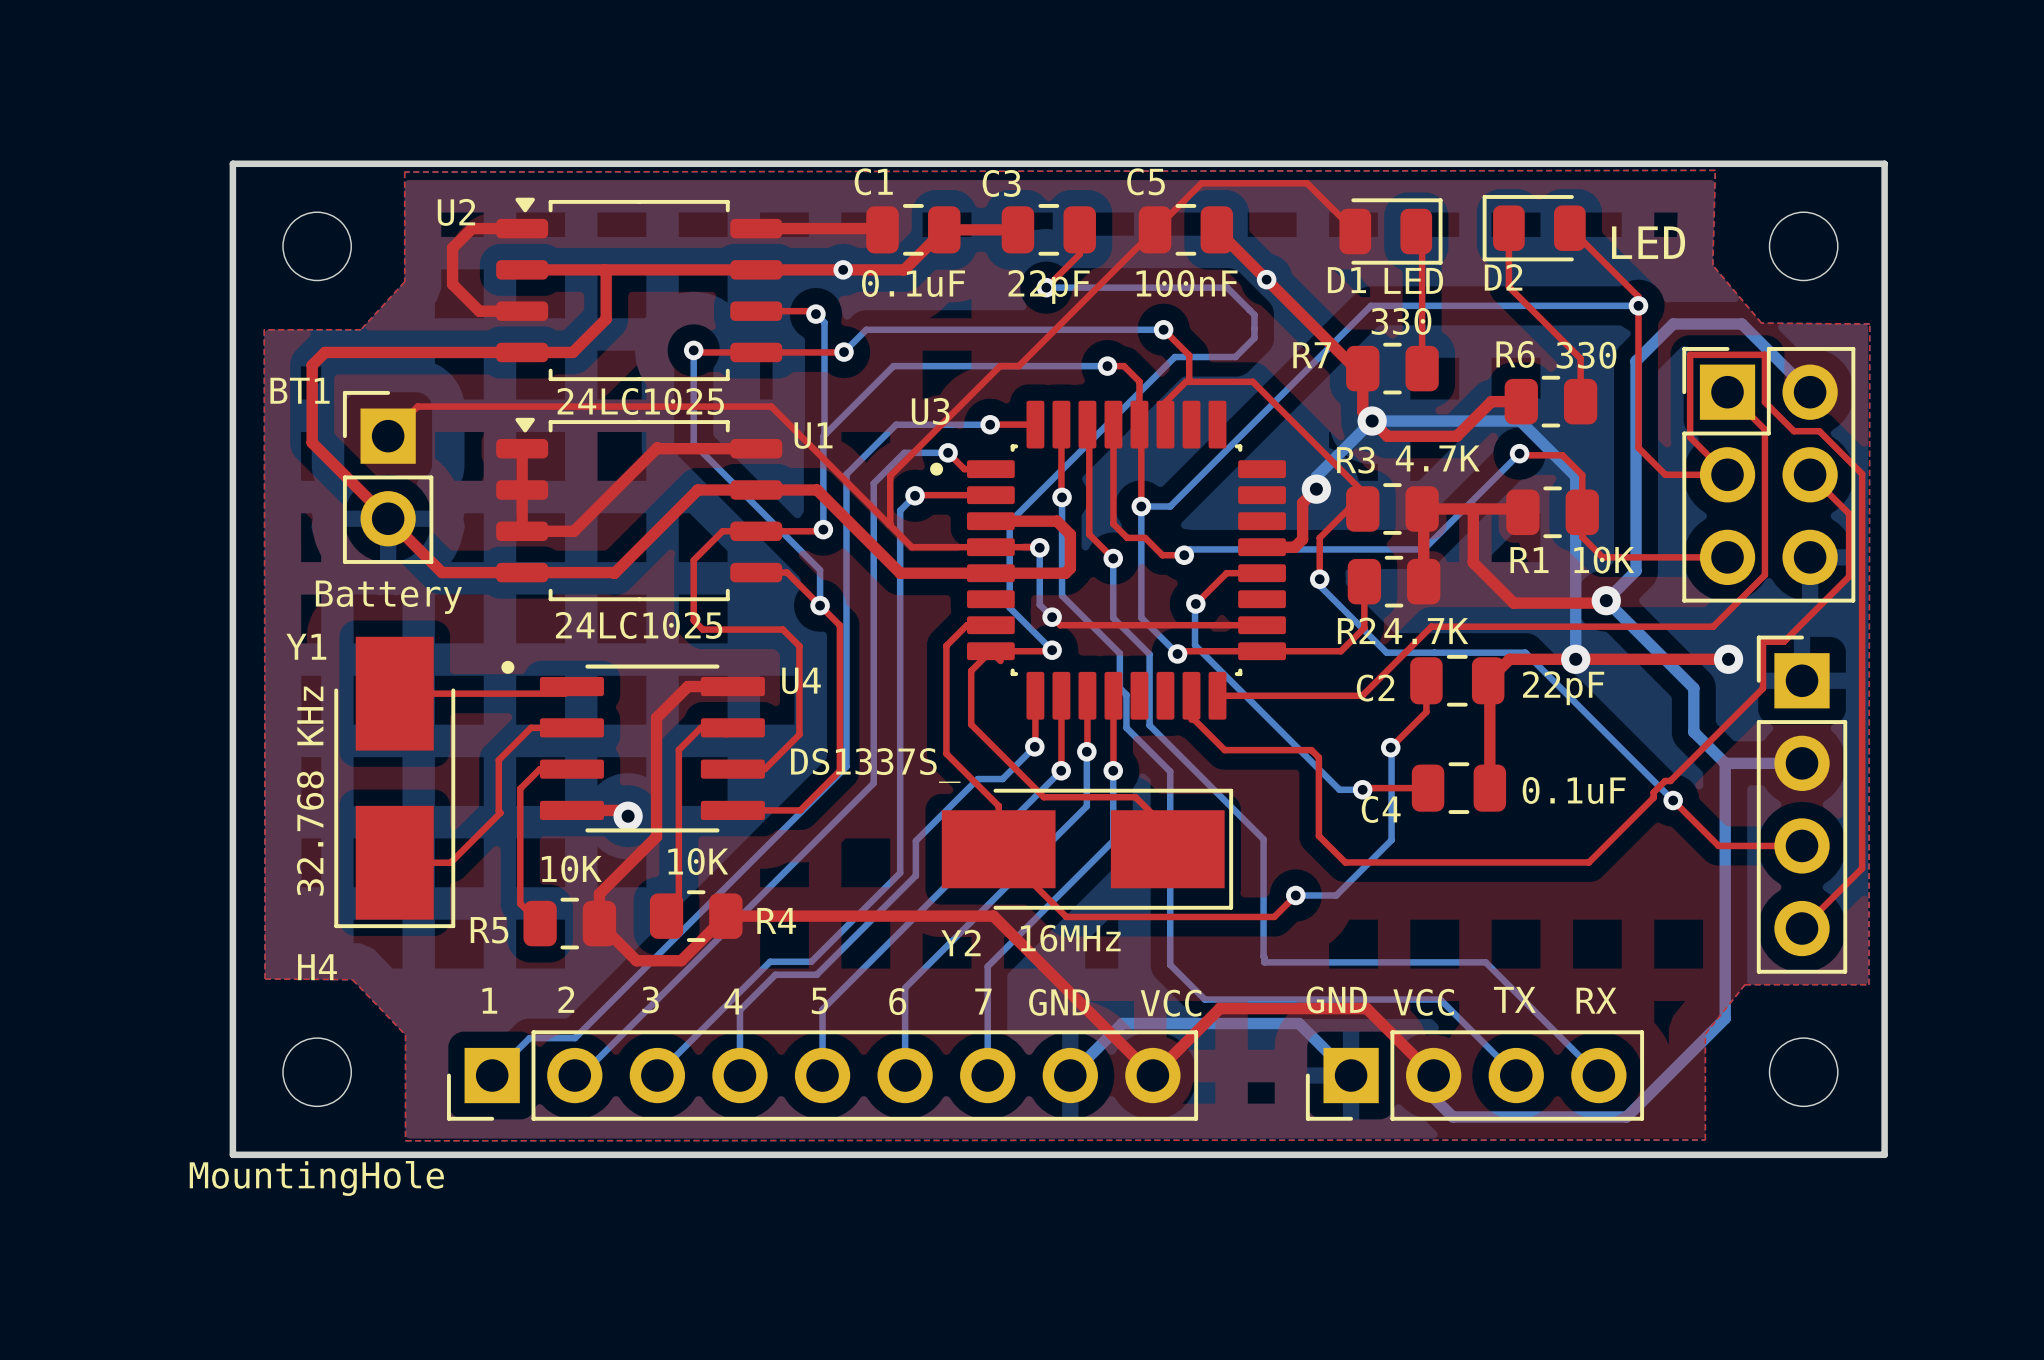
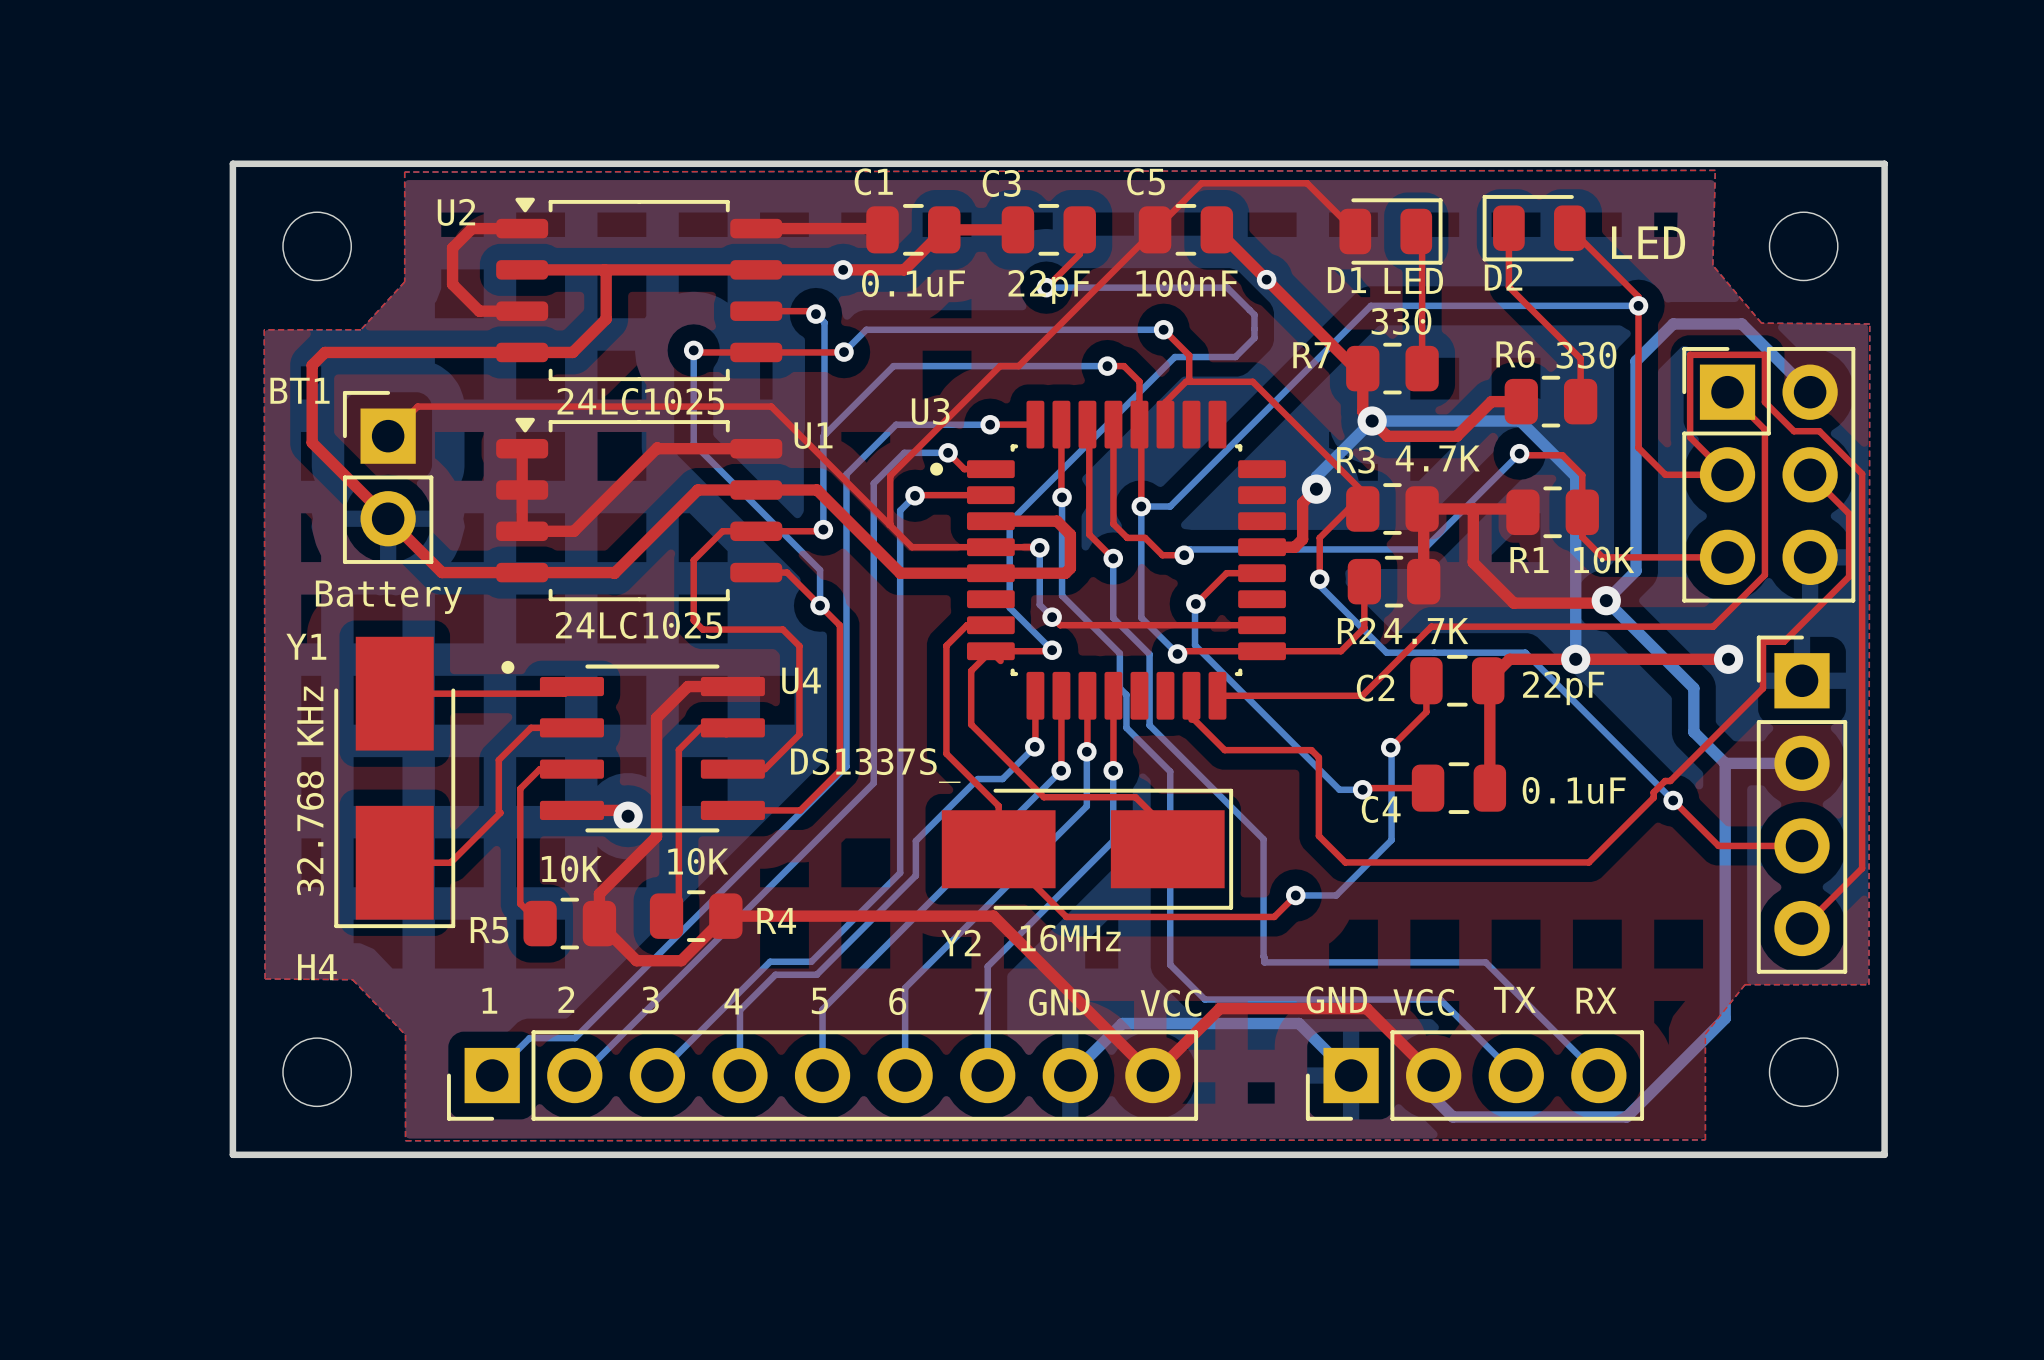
H4 value: MountingHole (316, 1178) -> none

